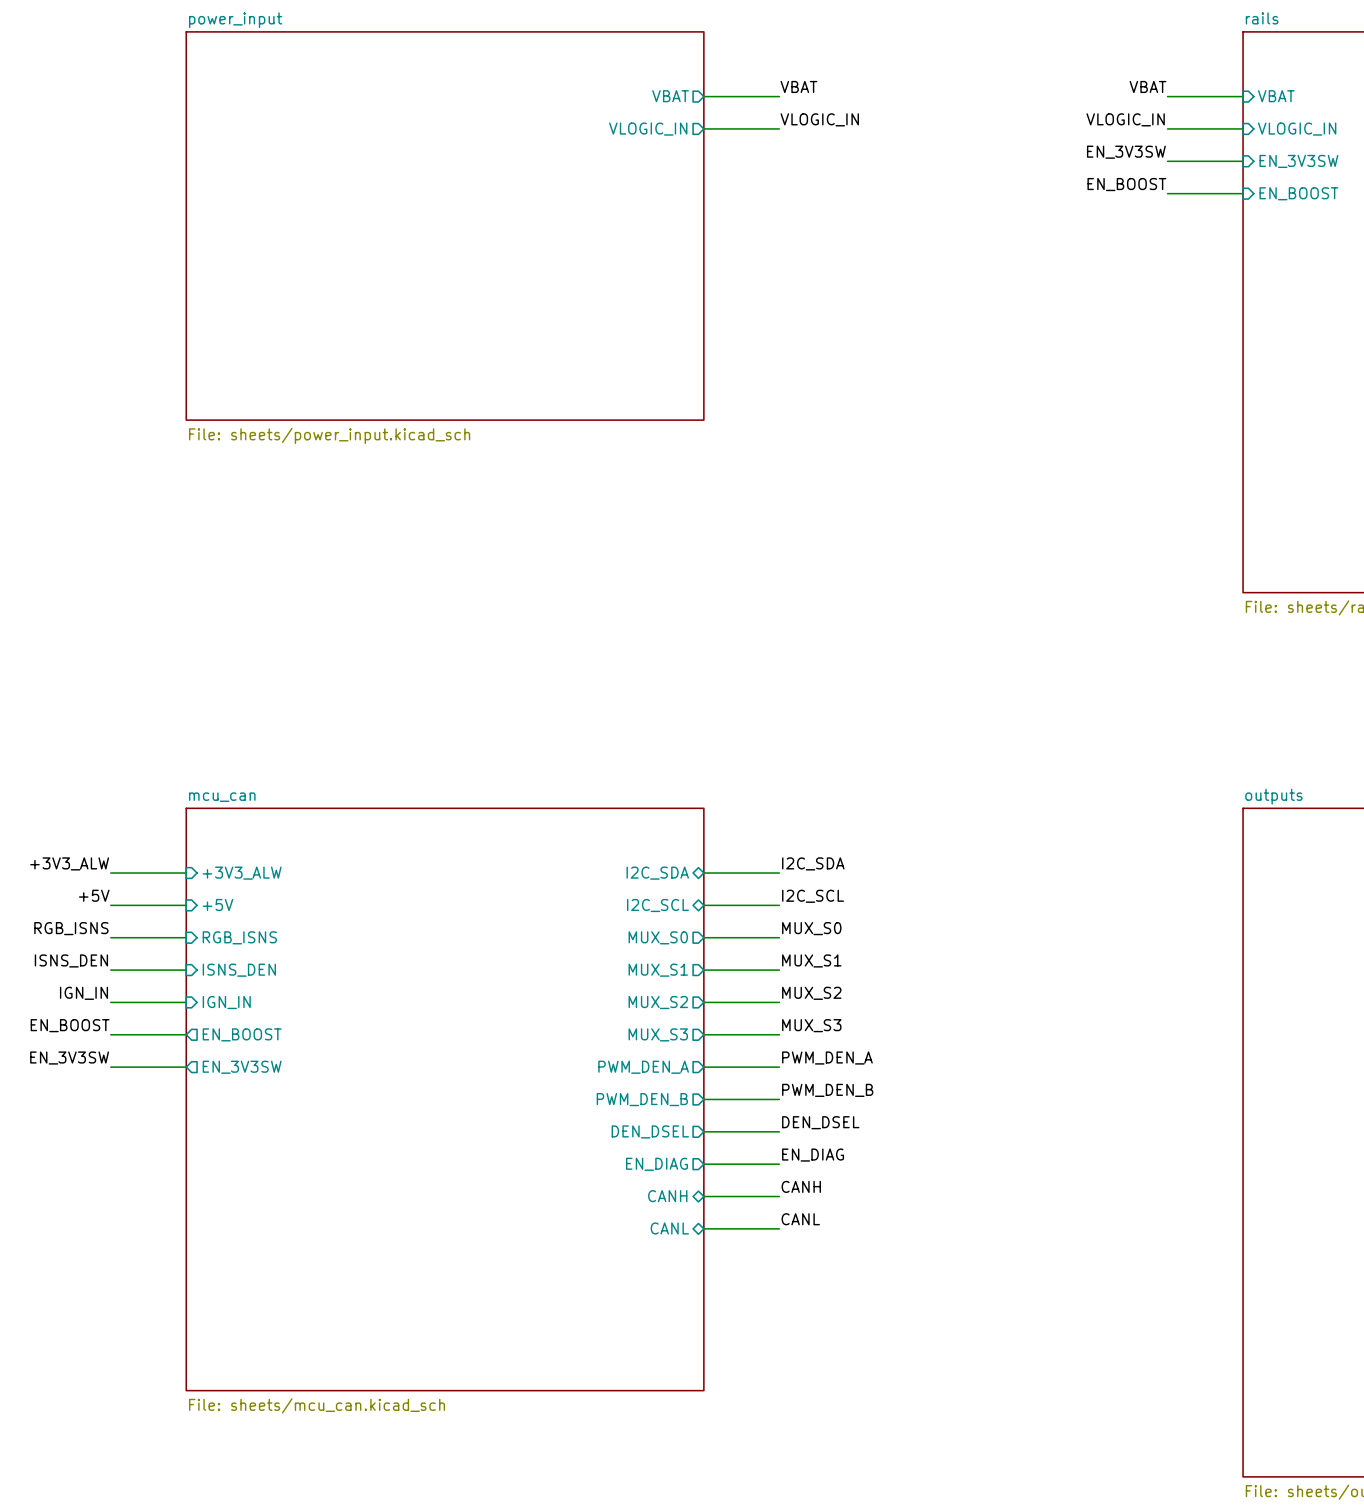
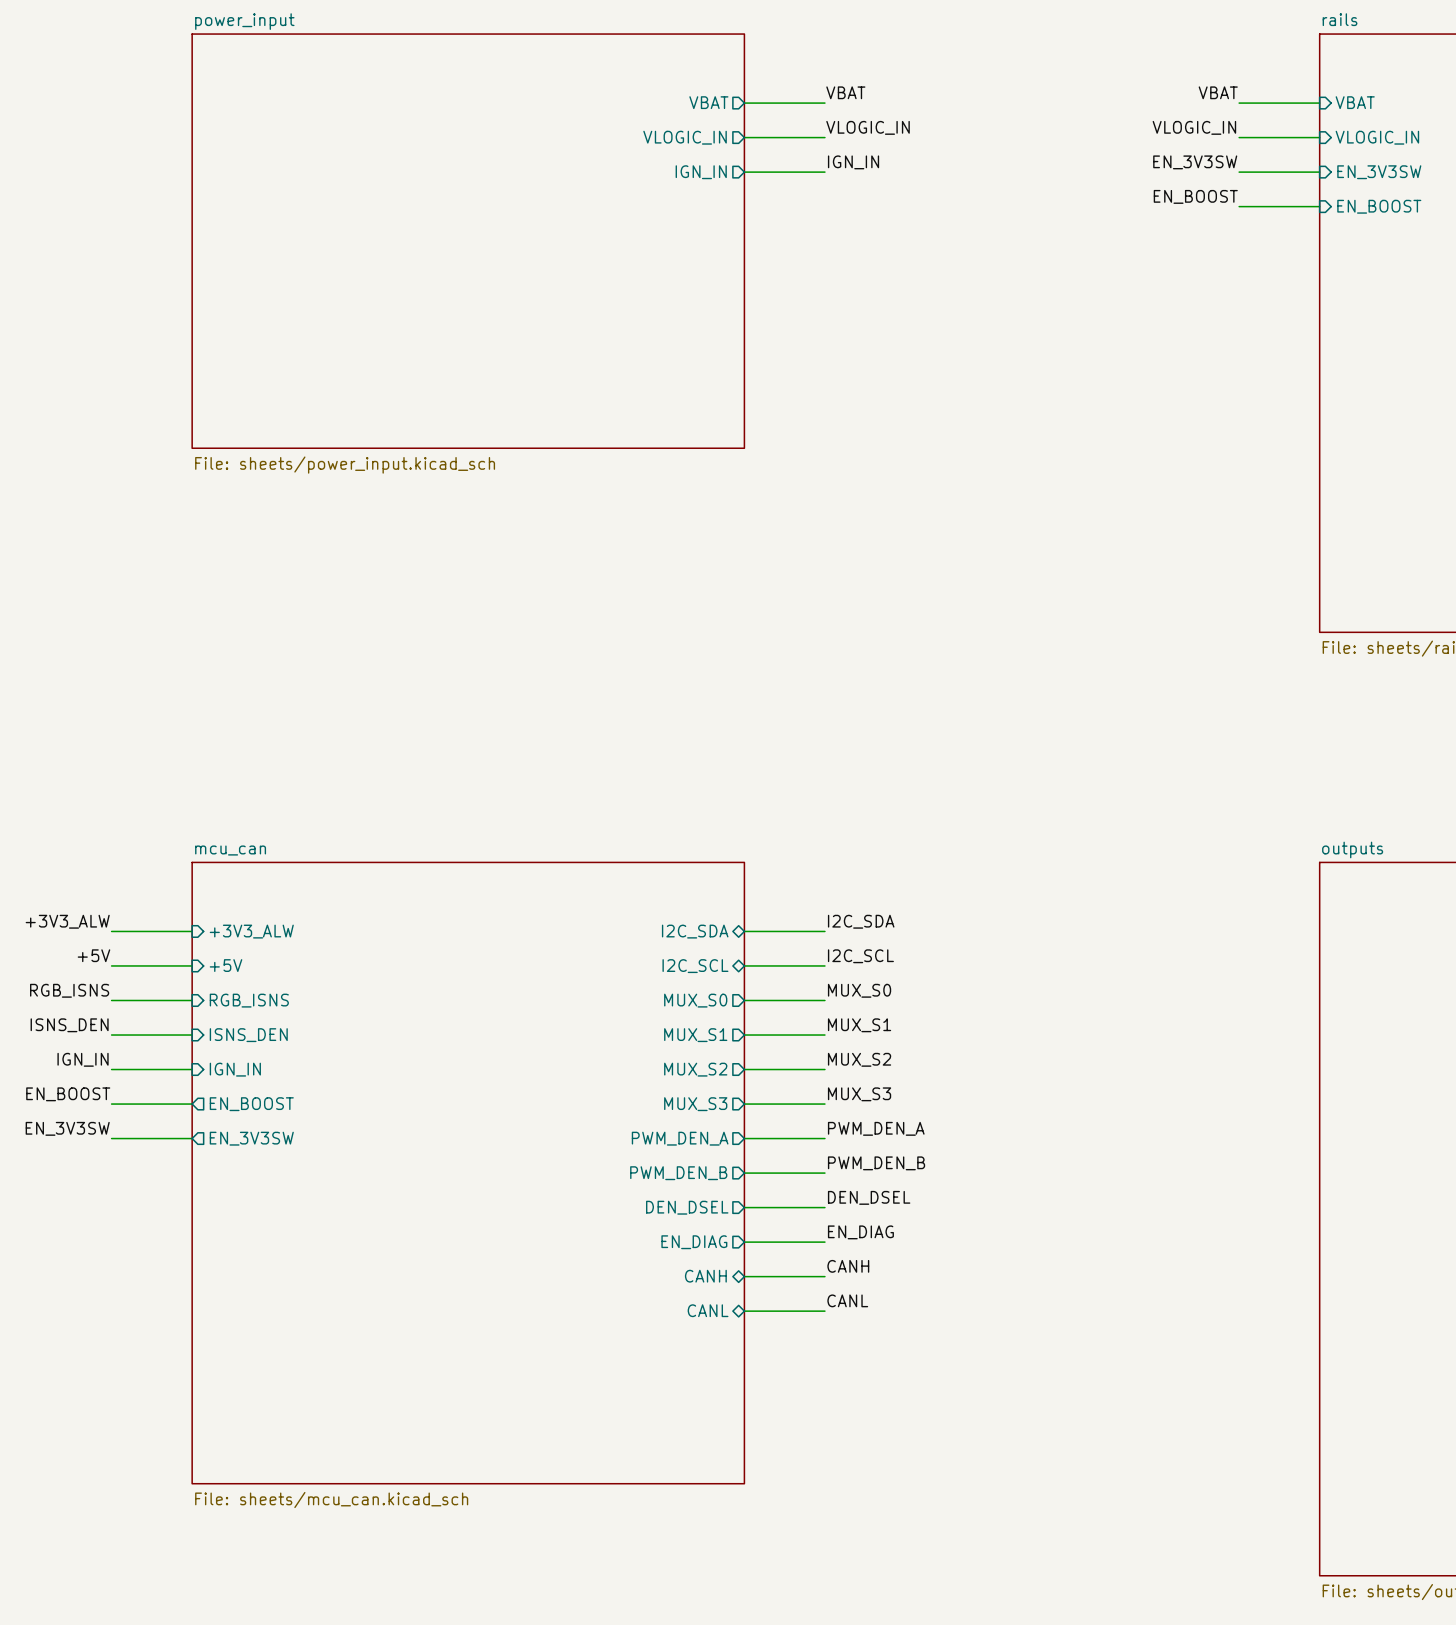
label: none -> IGN_IN (853, 162)
sheet pin: none -> IGN_IN (701, 172)
wire: none -> (744, 172) (824, 172)

